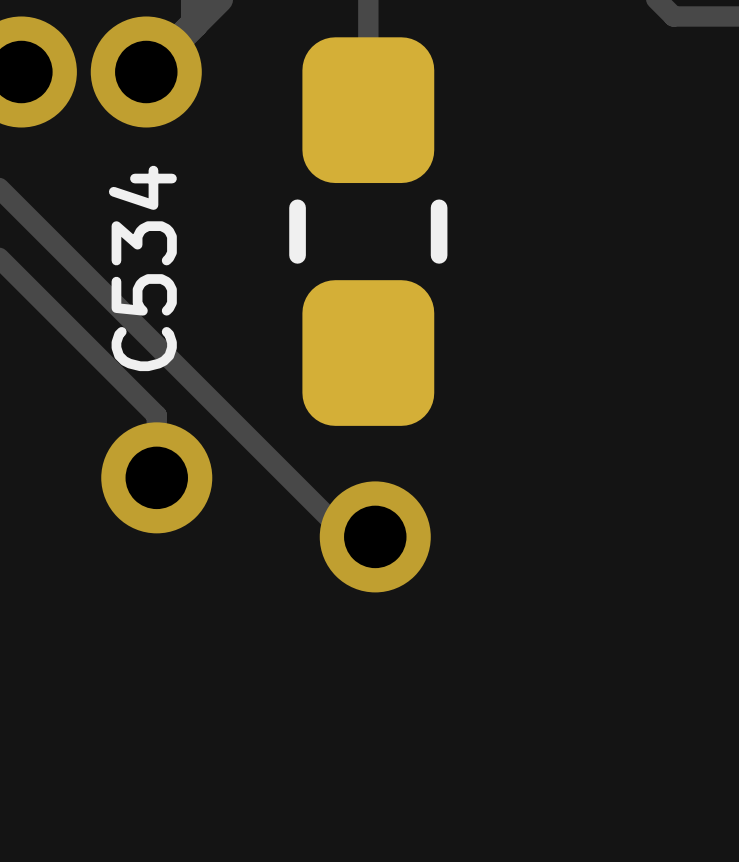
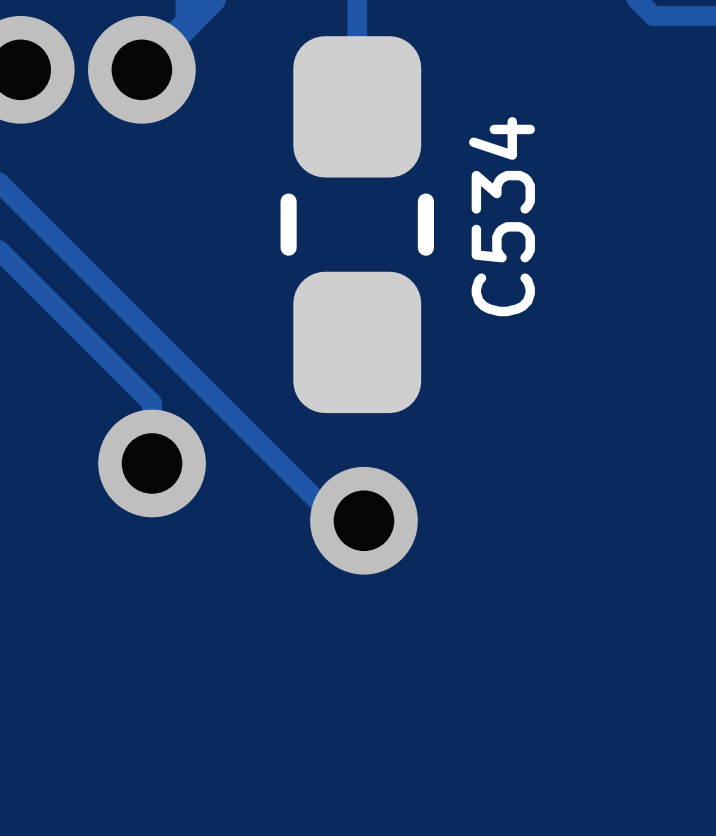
C534 name position: C534 (142, 268) -> C534 (502, 216)

